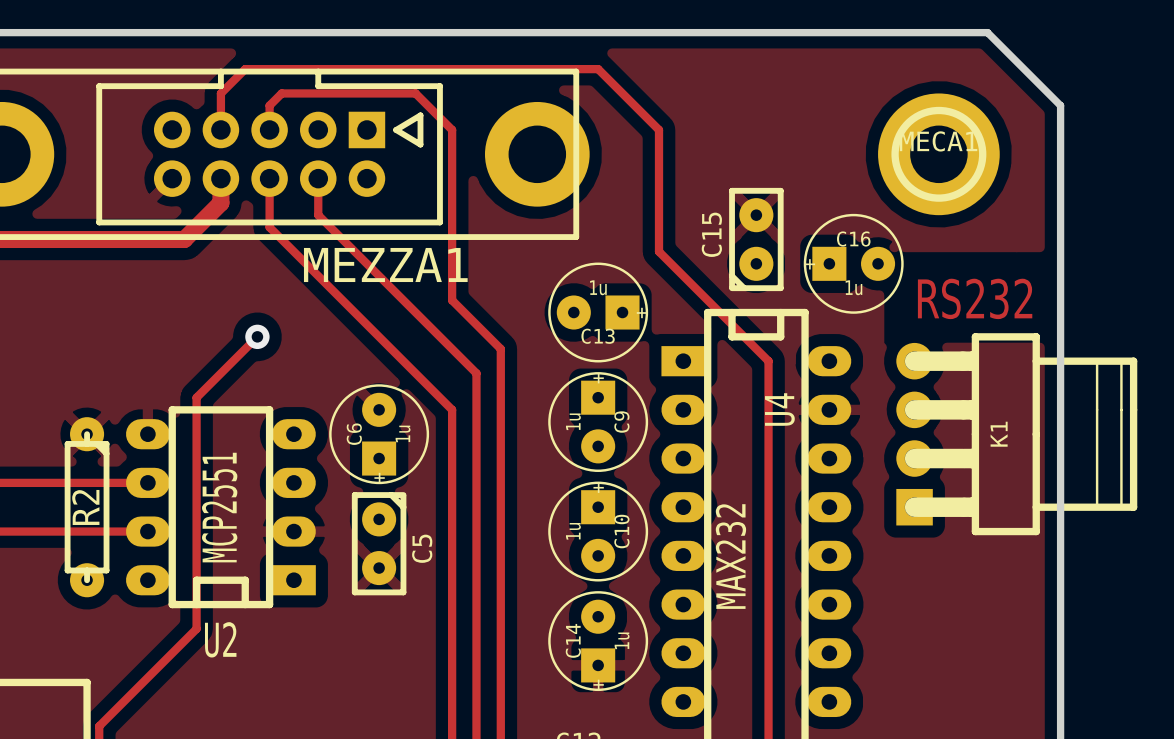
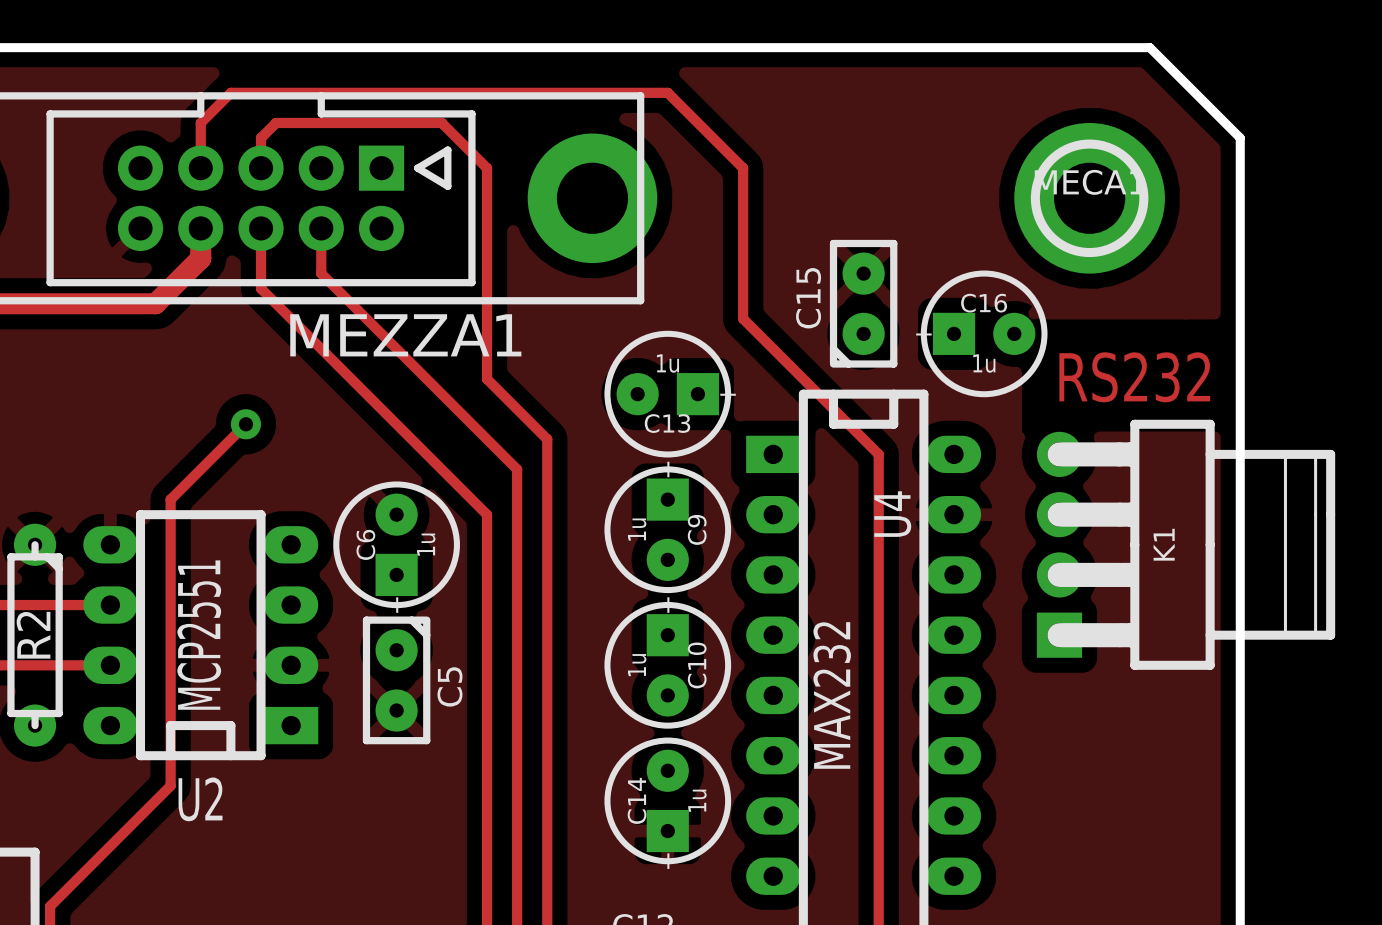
C16 footprint: [803, 213, 904, 314] -> [920, 270, 1048, 398]
C13 footprint: [548, 262, 649, 363] -> [604, 330, 732, 458]
C9 footprint: [548, 372, 649, 472] -> [604, 466, 732, 594]
C6 footprint: [329, 384, 430, 485] -> [333, 481, 460, 609]
C10 footprint: [548, 481, 649, 582] -> [604, 601, 732, 729]
C14 footprint: [548, 591, 649, 692] -> [604, 737, 732, 865]

